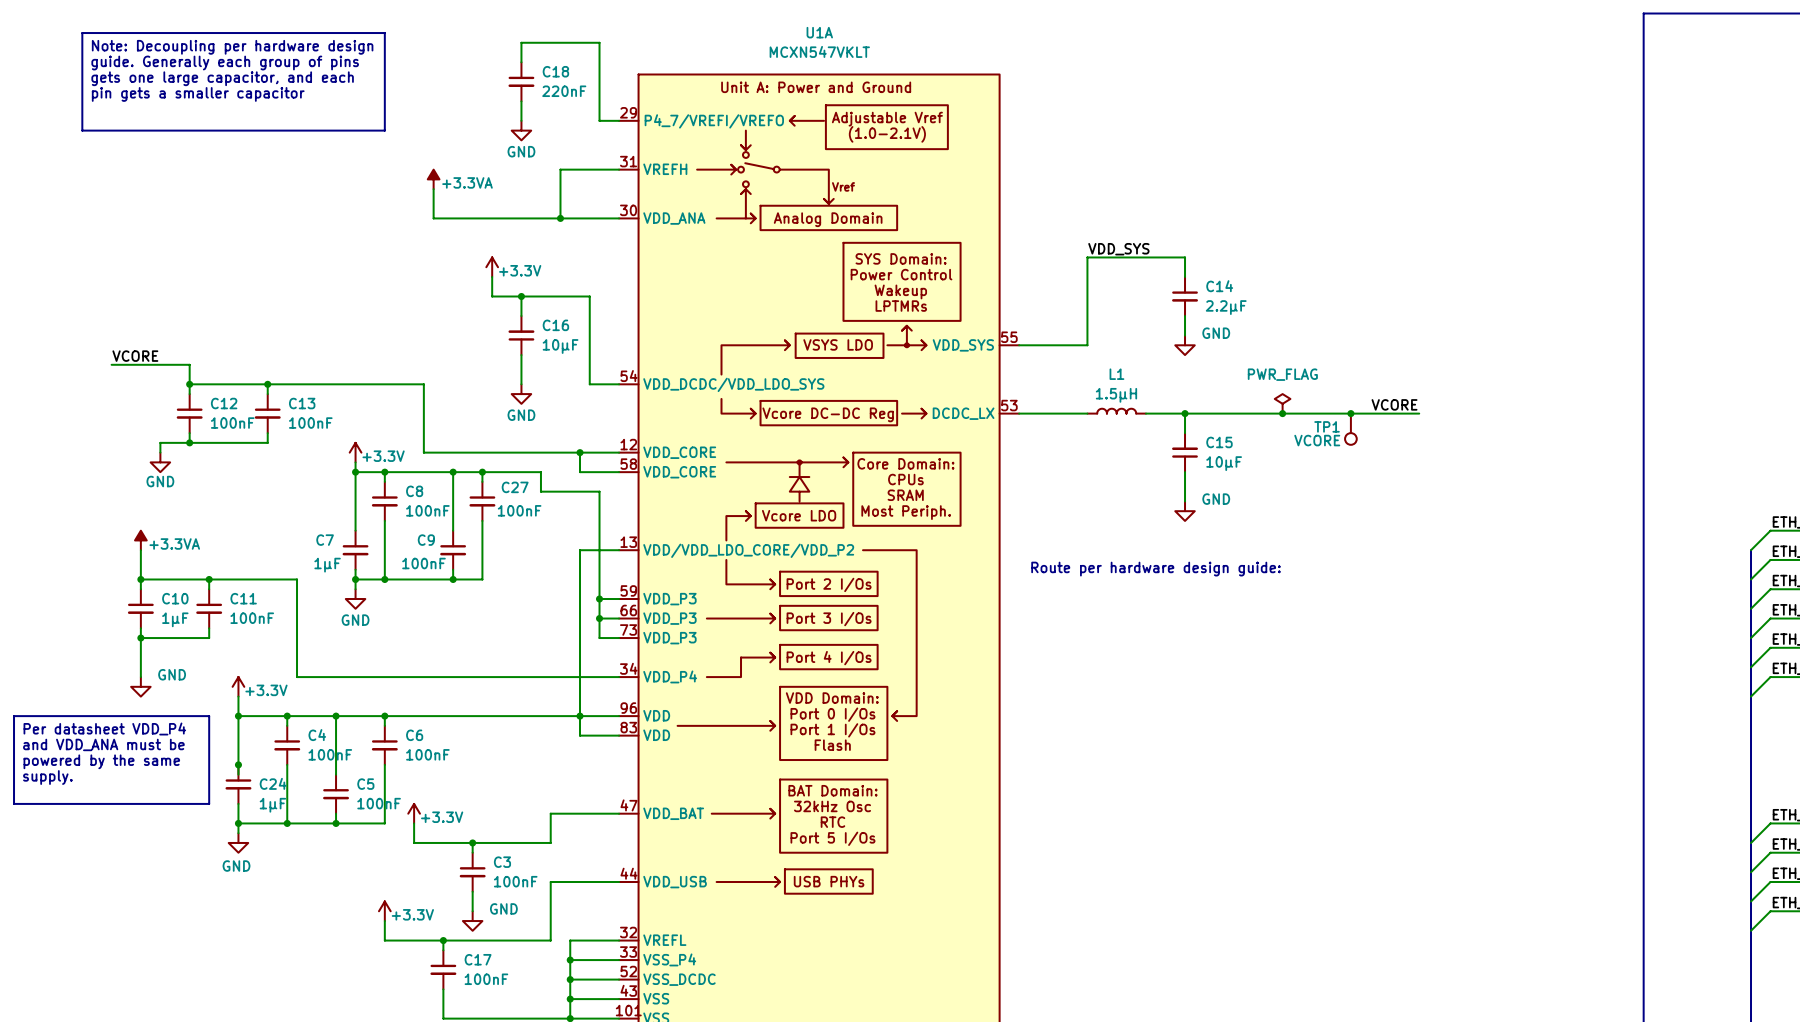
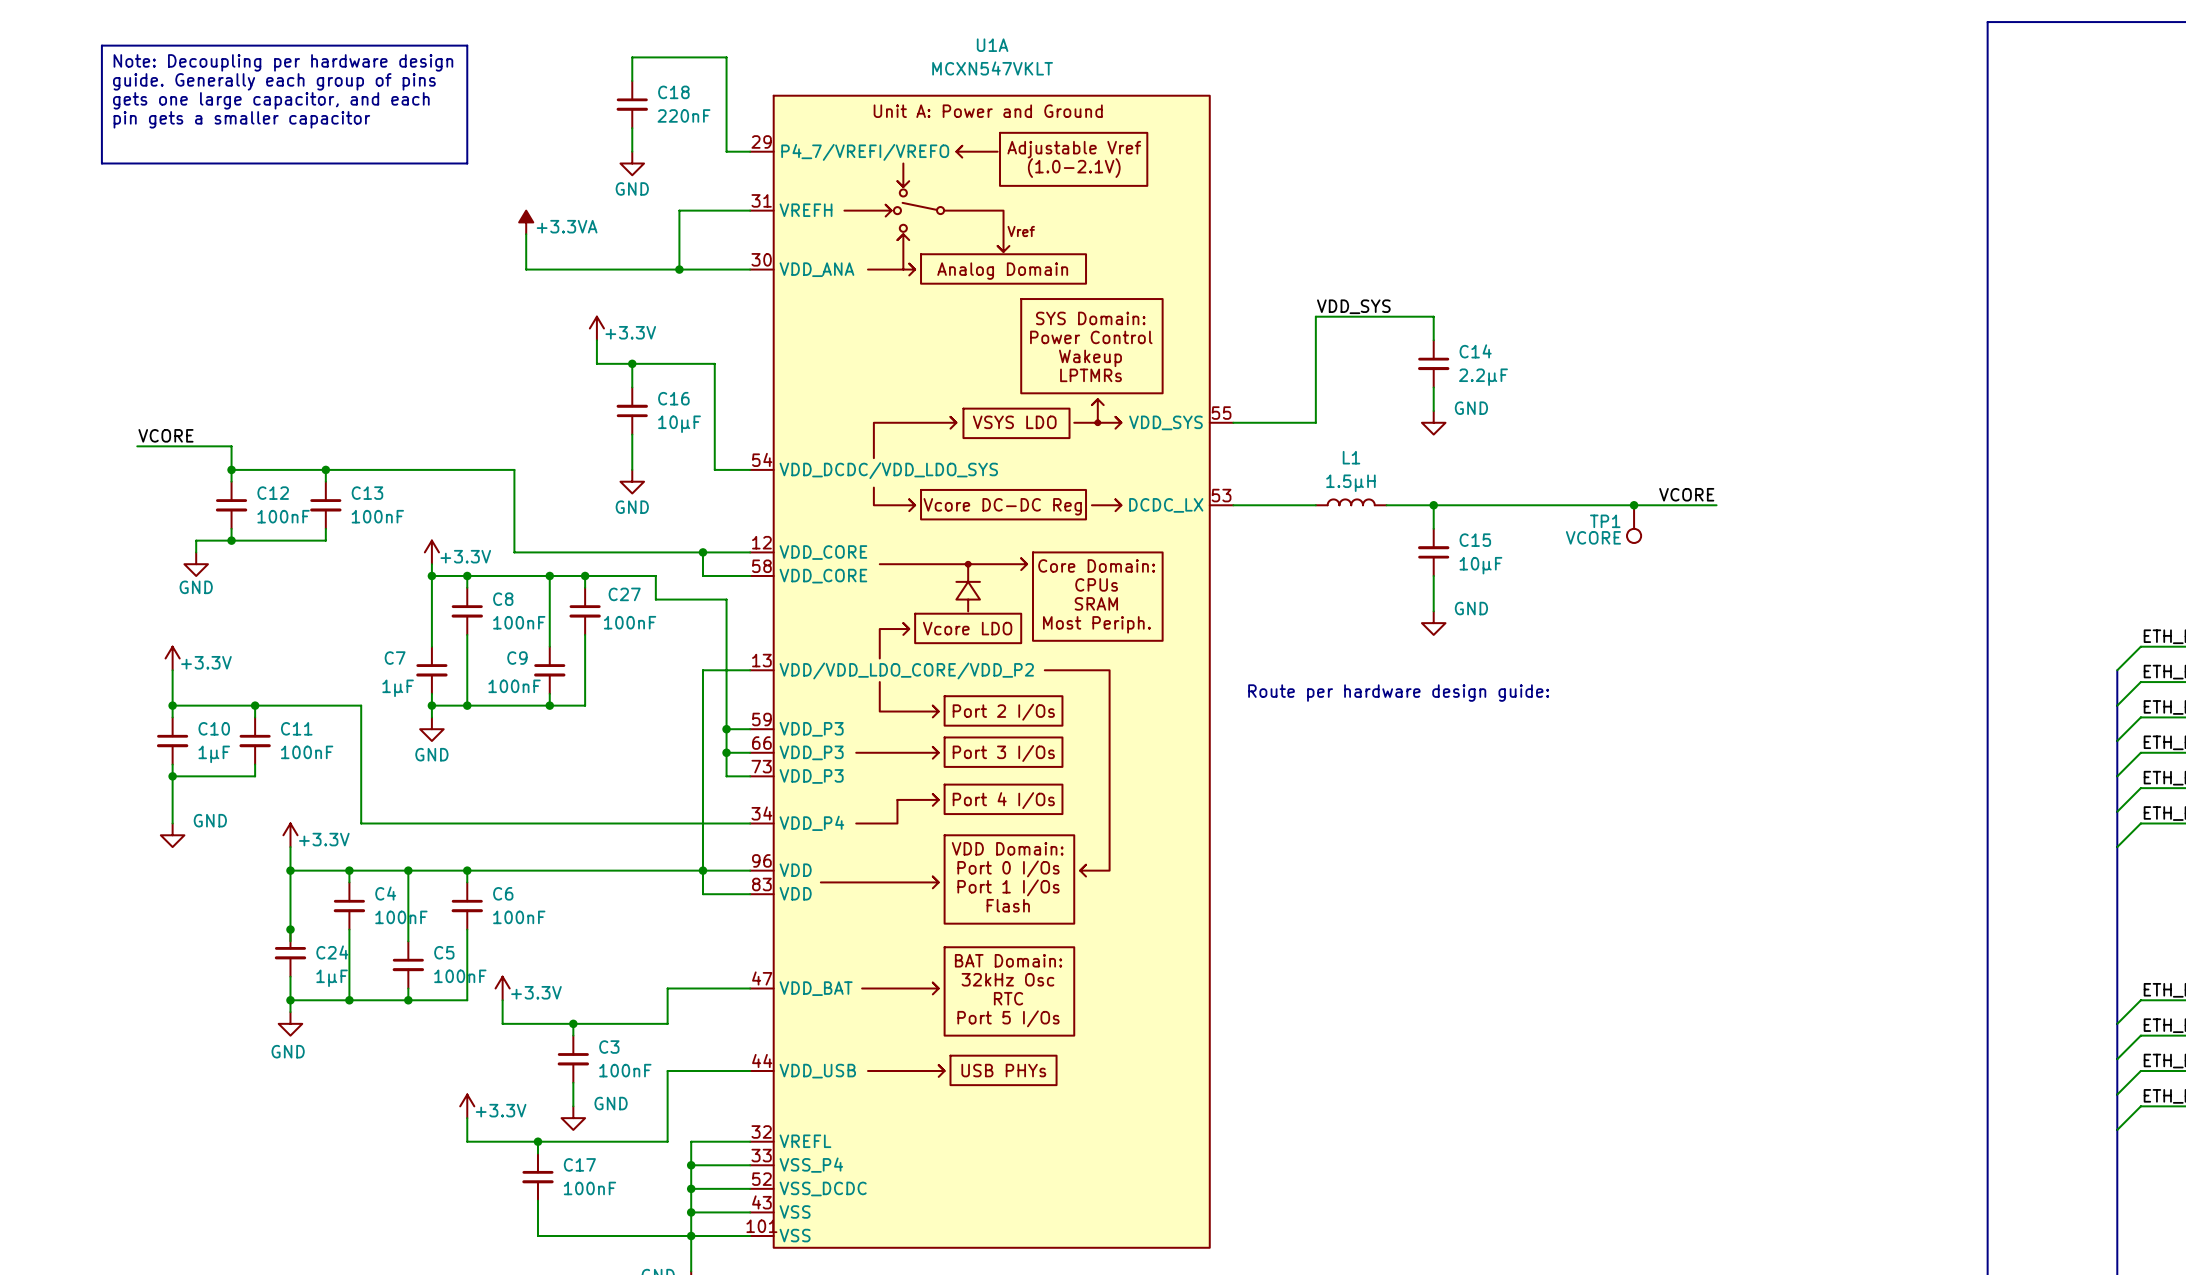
power symbol: PWR_FLAG (1282, 403) -> none
junction: (1282, 413) -> none
power symbol: +3.3VA (140, 540) -> +3.3V (172, 658)
line: (14, 716) (209, 716) (209, 803) (14, 803) (14, 716) -> none
text: Per datasheet VDD_P4 (104, 729) -> none
text: and VDD_ANA must be (103, 744) -> none
text: powered by the same (101, 761) -> none
text: supply. (47, 777) -> none

